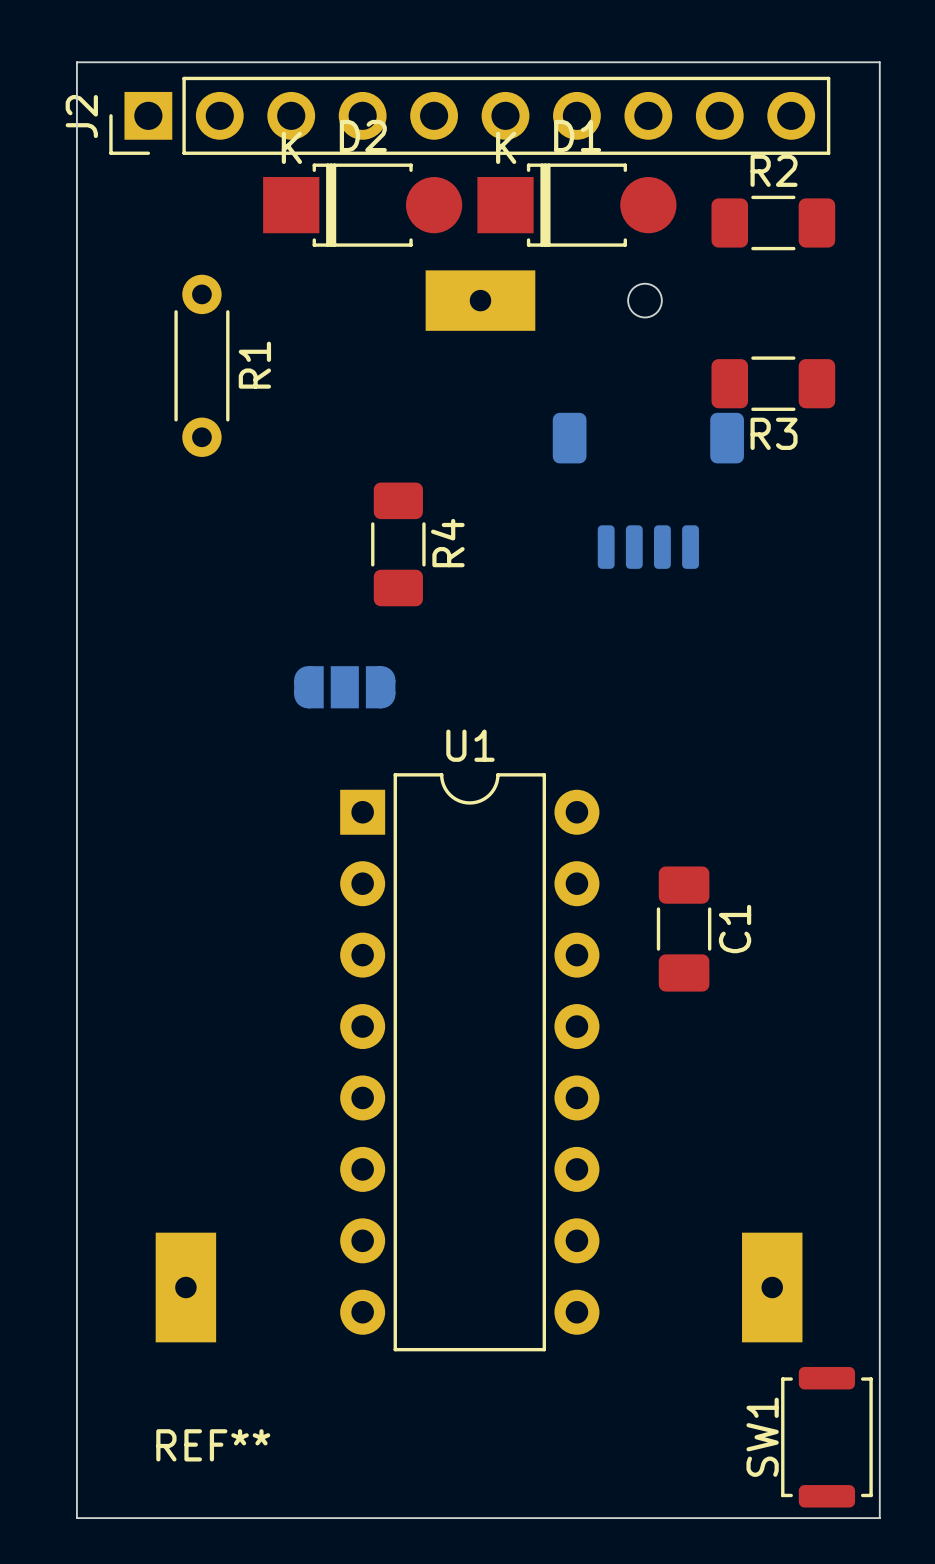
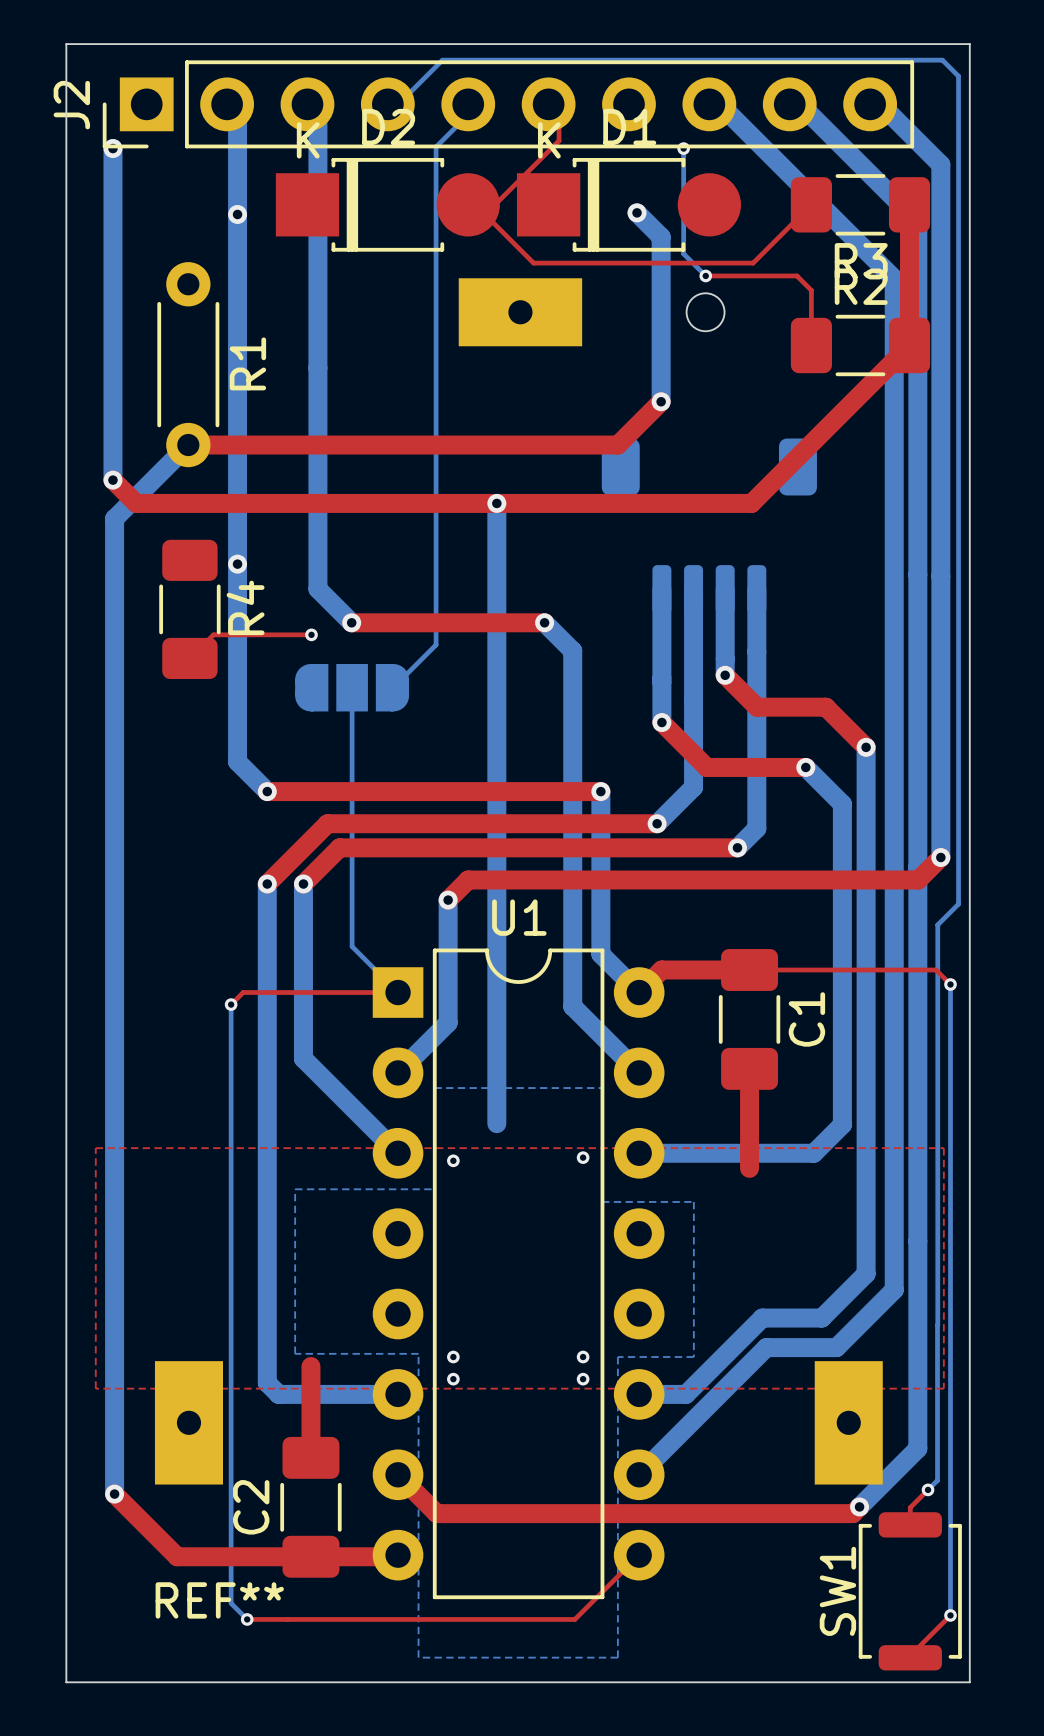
bottom track: none -> (237, 104) (237, 761) (267, 791)
bottom track: none -> (317, 104) (317, 589) (351, 622)
bottom track: none -> (398, 104) (442, 60) (942, 60) (958, 76) (958, 904) (937, 924) (937, 1325)
bottom track: none -> (478, 104) (436, 146) (436, 644) (393, 687)
top track: none -> (559, 104) (559, 140) (485, 214) (533, 263) (753, 263) (811, 204)
bottom track: none -> (719, 104) (894, 278) (894, 1289) (836, 1347) (766, 1347) (639, 1474)
bottom track: none -> (800, 104) (917, 222) (917, 1448) (859, 1506)
bottom track: none -> (880, 104) (940, 164) (940, 857)
bottom track: none -> (112, 148) (112, 480)
via: none -> (112, 148)
bottom track: none -> (683, 148) (683, 253) (705, 275)
via: none -> (683, 148)
top track: none -> (909, 204) (909, 345) (751, 503) (136, 503) (112, 480)
bottom track: none -> (637, 212) (661, 236) (661, 401)
via: none -> (637, 212)
via: none -> (237, 214)
R2 position: (773, 222) -> (860, 345)
top track: none -> (705, 275) (796, 275) (811, 290) (811, 345) (800, 345)
via: none -> (705, 275)
R1 position: (201, 365) -> (188, 364)
top track: none -> (661, 401) (617, 445) (188, 445)
via: none -> (661, 401)
R3 position: (773, 383) -> (860, 204)
bottom track: none -> (188, 445) (114, 518) (114, 1494)
via: none -> (112, 480)
bottom track: none -> (496, 503) (496, 1123)
via: none -> (496, 503)
via: none -> (237, 564)
R4 position: (398, 544) -> (189, 609)
bottom track: none -> (661, 589) (661, 722)
bottom track: none -> (693, 589) (693, 787) (657, 823)
bottom track: none -> (725, 589) (725, 675)
bottom track: none -> (756, 589) (756, 828) (737, 847)
top track: none -> (351, 622) (544, 622)
via: none -> (351, 622)
bottom track: none -> (544, 622) (572, 650) (572, 1006) (639, 1072)
via: none -> (544, 622)
top track: none -> (311, 634) (213, 634) (189, 658) (206, 675)
via: none -> (311, 634)
top track: none -> (725, 675) (757, 707) (825, 707) (866, 747)
via: none -> (725, 675)
bottom track: none -> (352, 687) (352, 946) (398, 992)
top track: none -> (661, 722) (706, 767) (805, 767)
via: none -> (661, 722)
part position: (344, 687) -> (352, 687)
bottom track: none -> (866, 747) (866, 1273) (821, 1318) (762, 1318) (685, 1394) (639, 1394) (639, 1392)
via: none -> (866, 747)
bottom track: none -> (805, 767) (842, 804) (842, 1124) (813, 1153) (639, 1153)
via: none -> (805, 767)
top track: none -> (267, 791) (600, 791)
via: none -> (267, 791)
bottom track: none -> (600, 791) (600, 954) (639, 992)
via: none -> (600, 791)
top track: none -> (657, 823) (327, 823) (267, 884)
via: none -> (657, 823)
top track: none -> (737, 847) (339, 847) (303, 884)
via: none -> (737, 847)
top track: none -> (940, 857) (918, 880) (468, 880) (448, 900)
via: none -> (940, 857)
bottom track: none -> (267, 884) (267, 1382) (278, 1394) (398, 1394)
via: none -> (267, 884)
bottom track: none -> (303, 884) (303, 1058) (398, 1153)
via: none -> (303, 884)
bottom track: none -> (448, 900) (448, 1022) (398, 1072)
via: none -> (448, 900)
top track: none -> (950, 984) (936, 969) (661, 969) (639, 992)
bottom track: none -> (950, 984) (950, 1615)
via: none -> (950, 984)
top track: none -> (398, 992) (243, 992) (231, 1004)
bottom track: none -> (231, 1004) (231, 1603) (247, 1619)
via: none -> (231, 1004)
top track: none -> (749, 1068) (749, 1168)
bottom zone outline: none -> (434, 1088) (434, 1189) (295, 1189) (295, 1353) (418, 1353) (418, 1657) (617, 1657) (617, 1357) (693, 1357) (693, 1201) (602, 1201) (602, 1088) (434, 1088)
top zone outline: none -> (95, 1148) (95, 1388) (943, 1388) (943, 1148) (95, 1148)
via: none -> (583, 1157)
via: none -> (453, 1160)
U1 position: (469, 1062) -> (518, 1273)
bottom track: none -> (937, 1325) (937, 1480) (928, 1489)
via: none -> (453, 1357)
via: none -> (583, 1357)
top track: none -> (310, 1366) (310, 1457)
via: none -> (453, 1379)
via: none -> (583, 1379)
top track: none -> (398, 1474) (436, 1513) (852, 1513) (859, 1506)
top track: none -> (928, 1489) (910, 1507) (910, 1524)
via: none -> (928, 1489)
top track: none -> (114, 1494) (177, 1556) (396, 1556) (398, 1555)
via: none -> (114, 1494)
C2: none -> (310, 1507)
via: none -> (859, 1506)
top track: none -> (639, 1555) (574, 1619) (247, 1619)
top track: none -> (950, 1615) (910, 1657)
via: none -> (950, 1615)
via: none -> (247, 1619)

